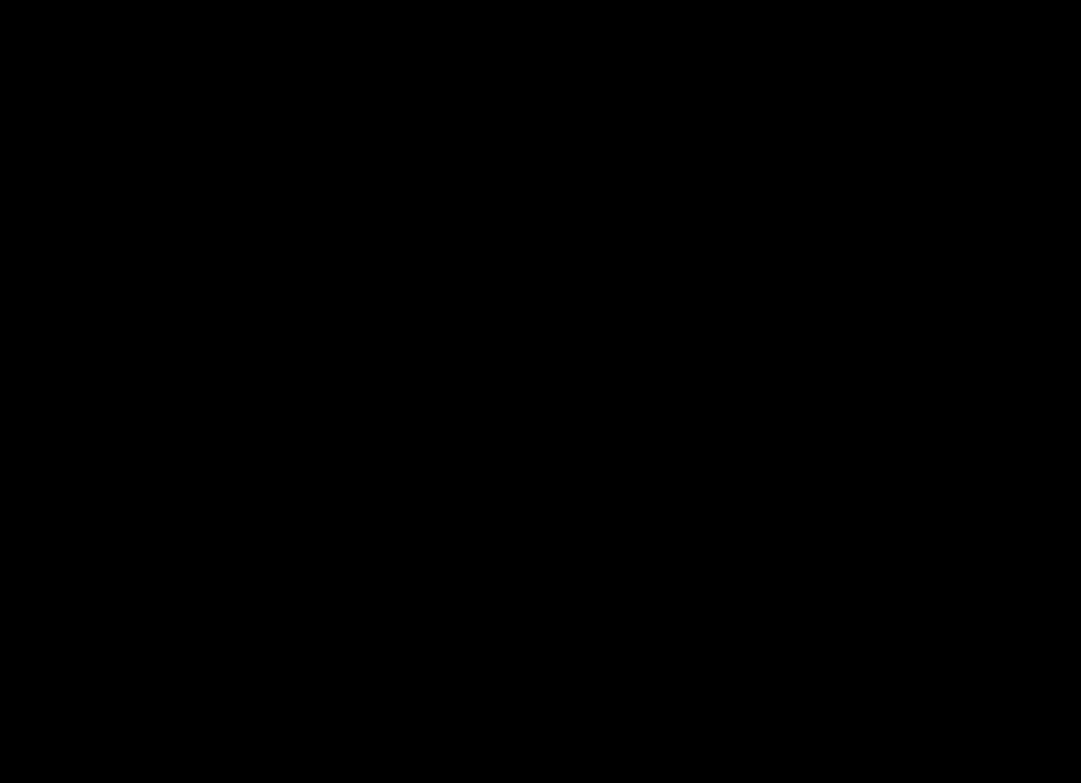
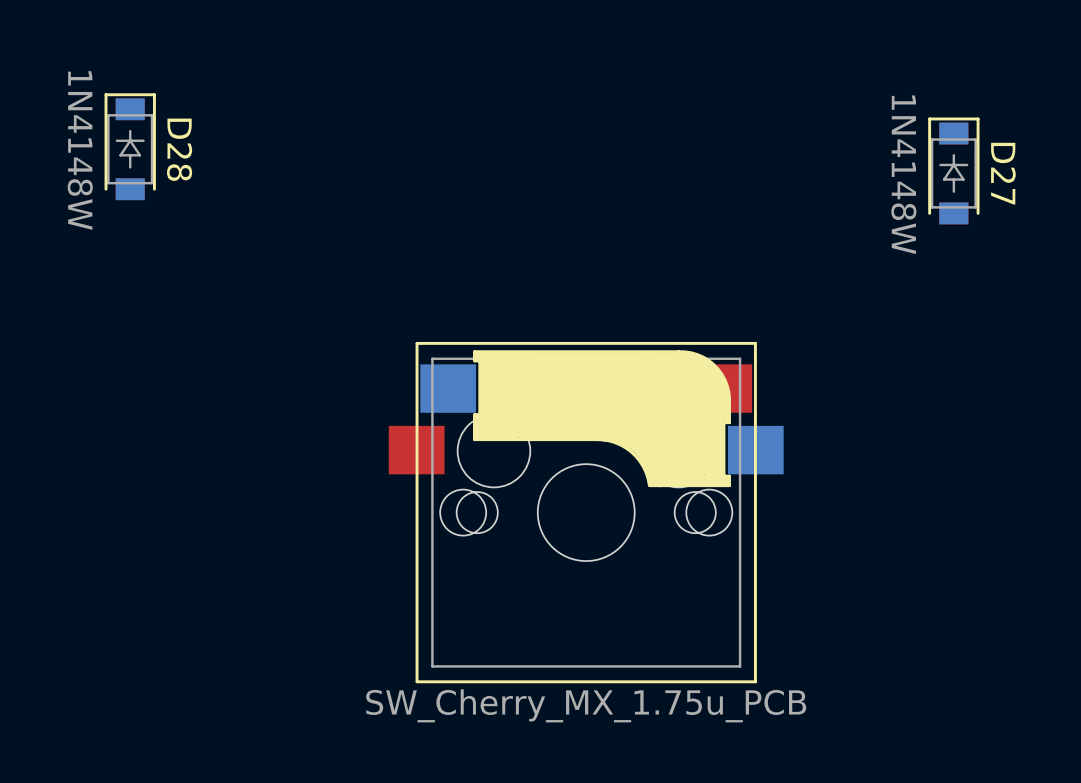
D28: none -> 1N4148W (130, 146)
D27: none -> 1N4148W (953, 170)
part: none -> SW_Cherry_MX_1.75u_PCB (586, 512)

